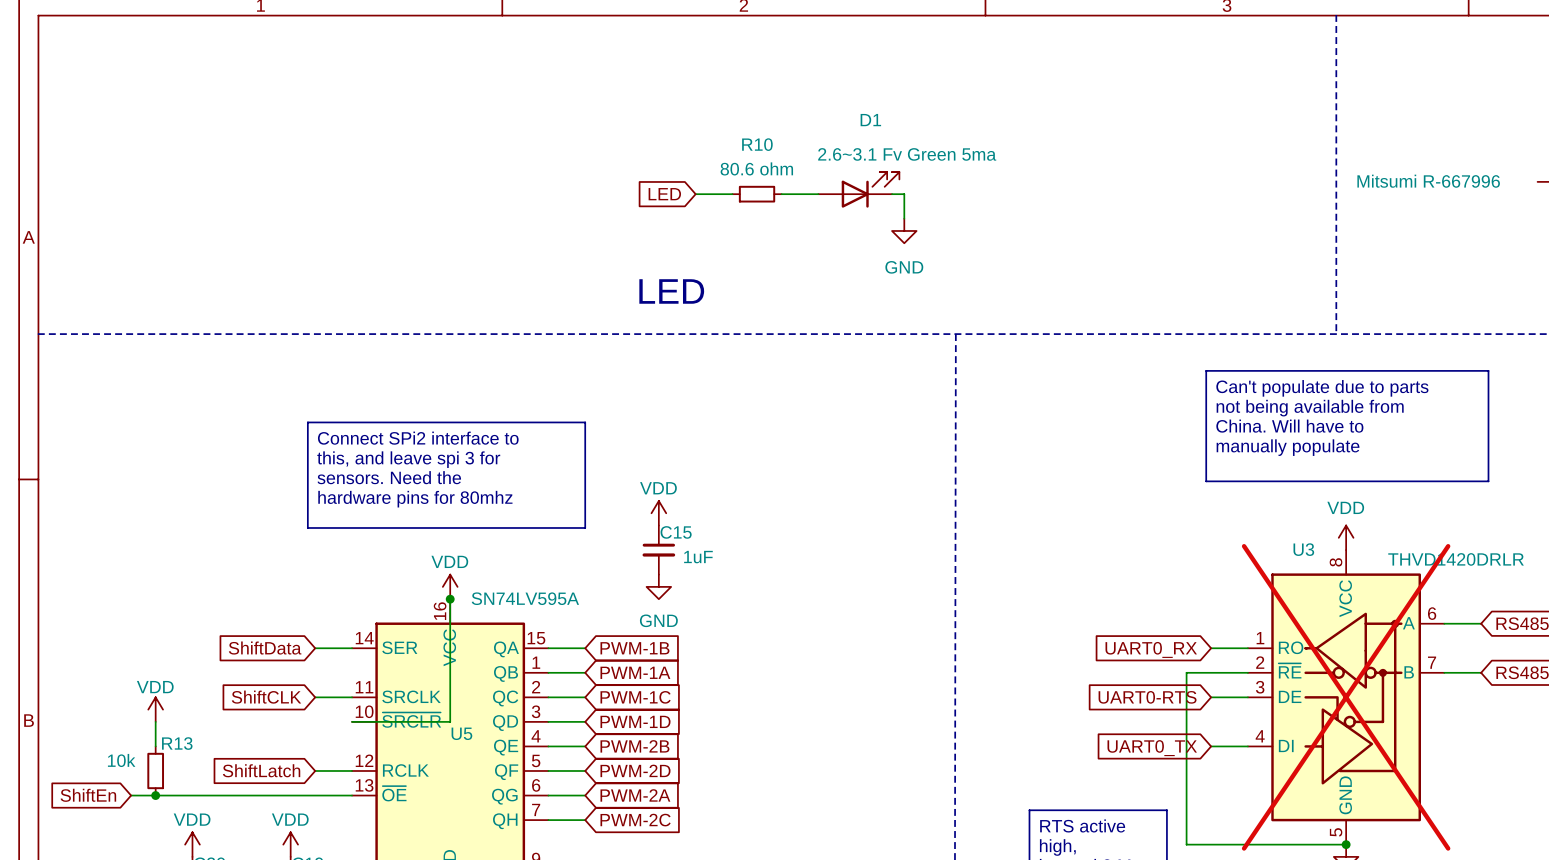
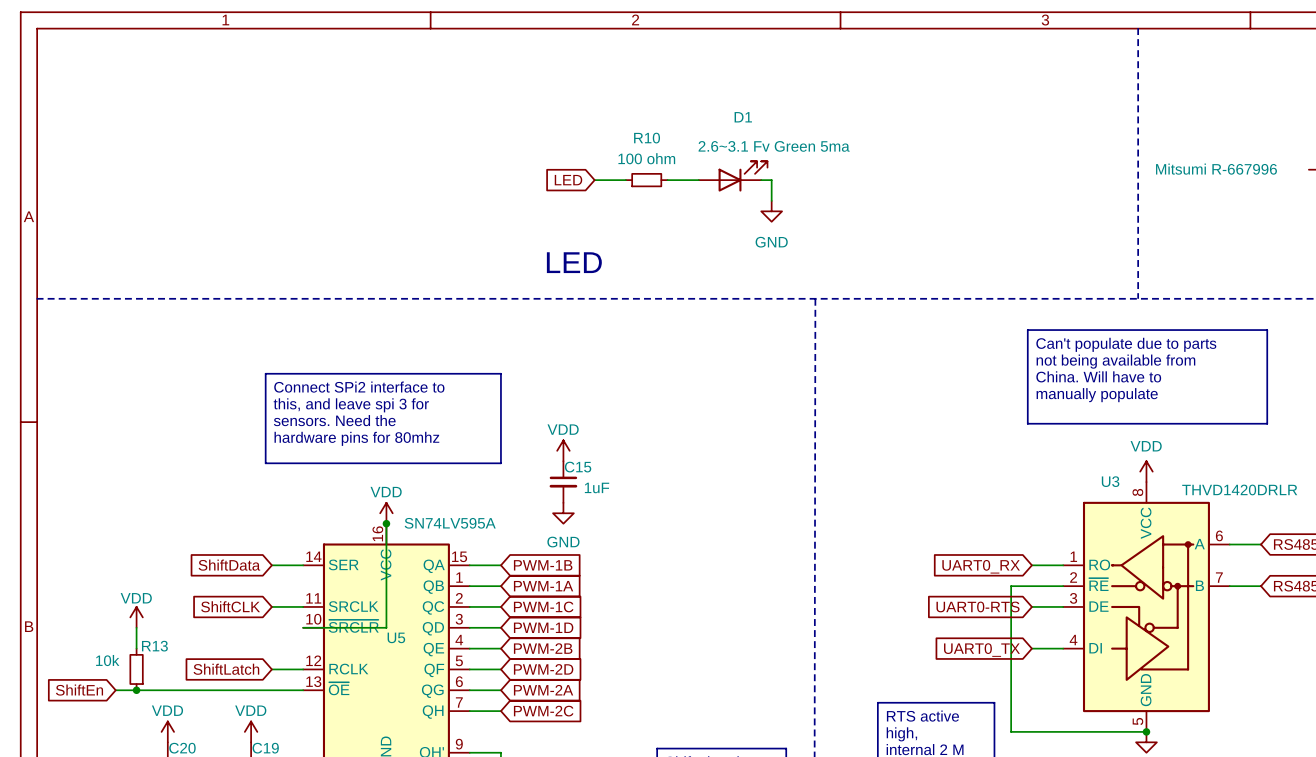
R10 value: 80.6 ohm (756, 168) -> 100 ohm (646, 158)
U3 do-not-place cross: (1346, 697) -> none

